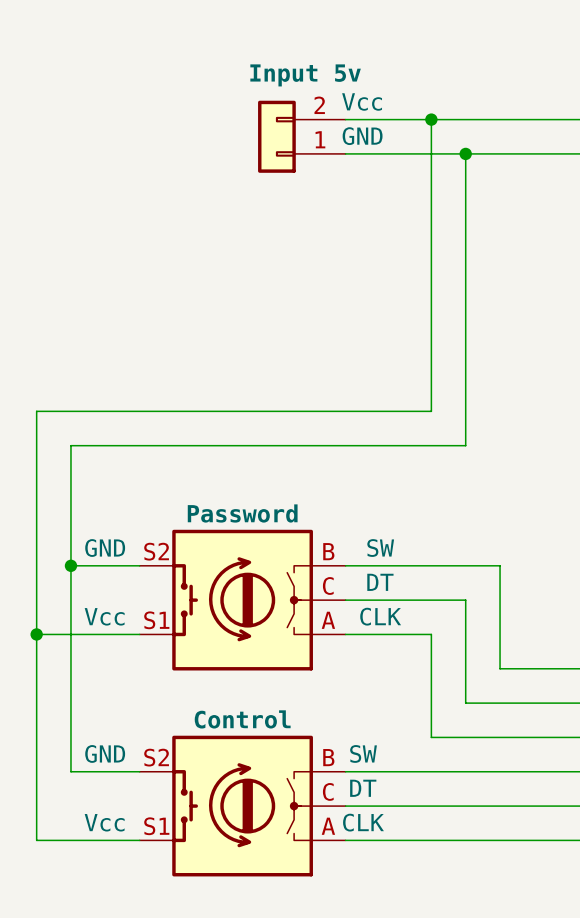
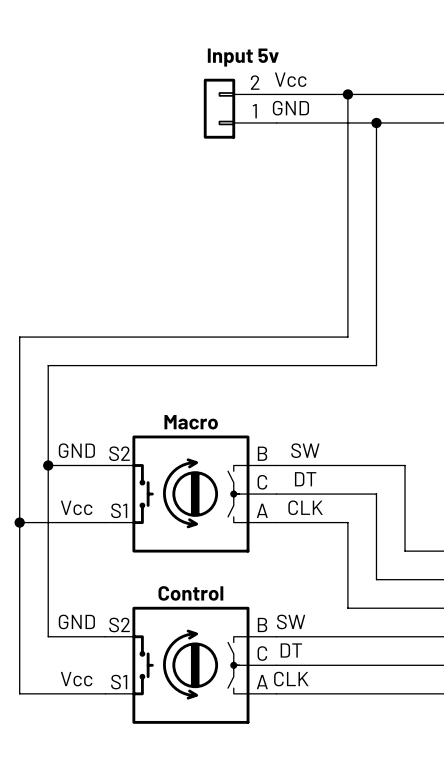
Password name: Password (242, 513) -> Macro (191, 422)

